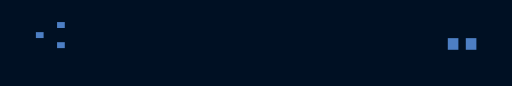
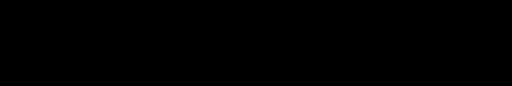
part: (50, 35) -> none
part: (462, 43) -> none

